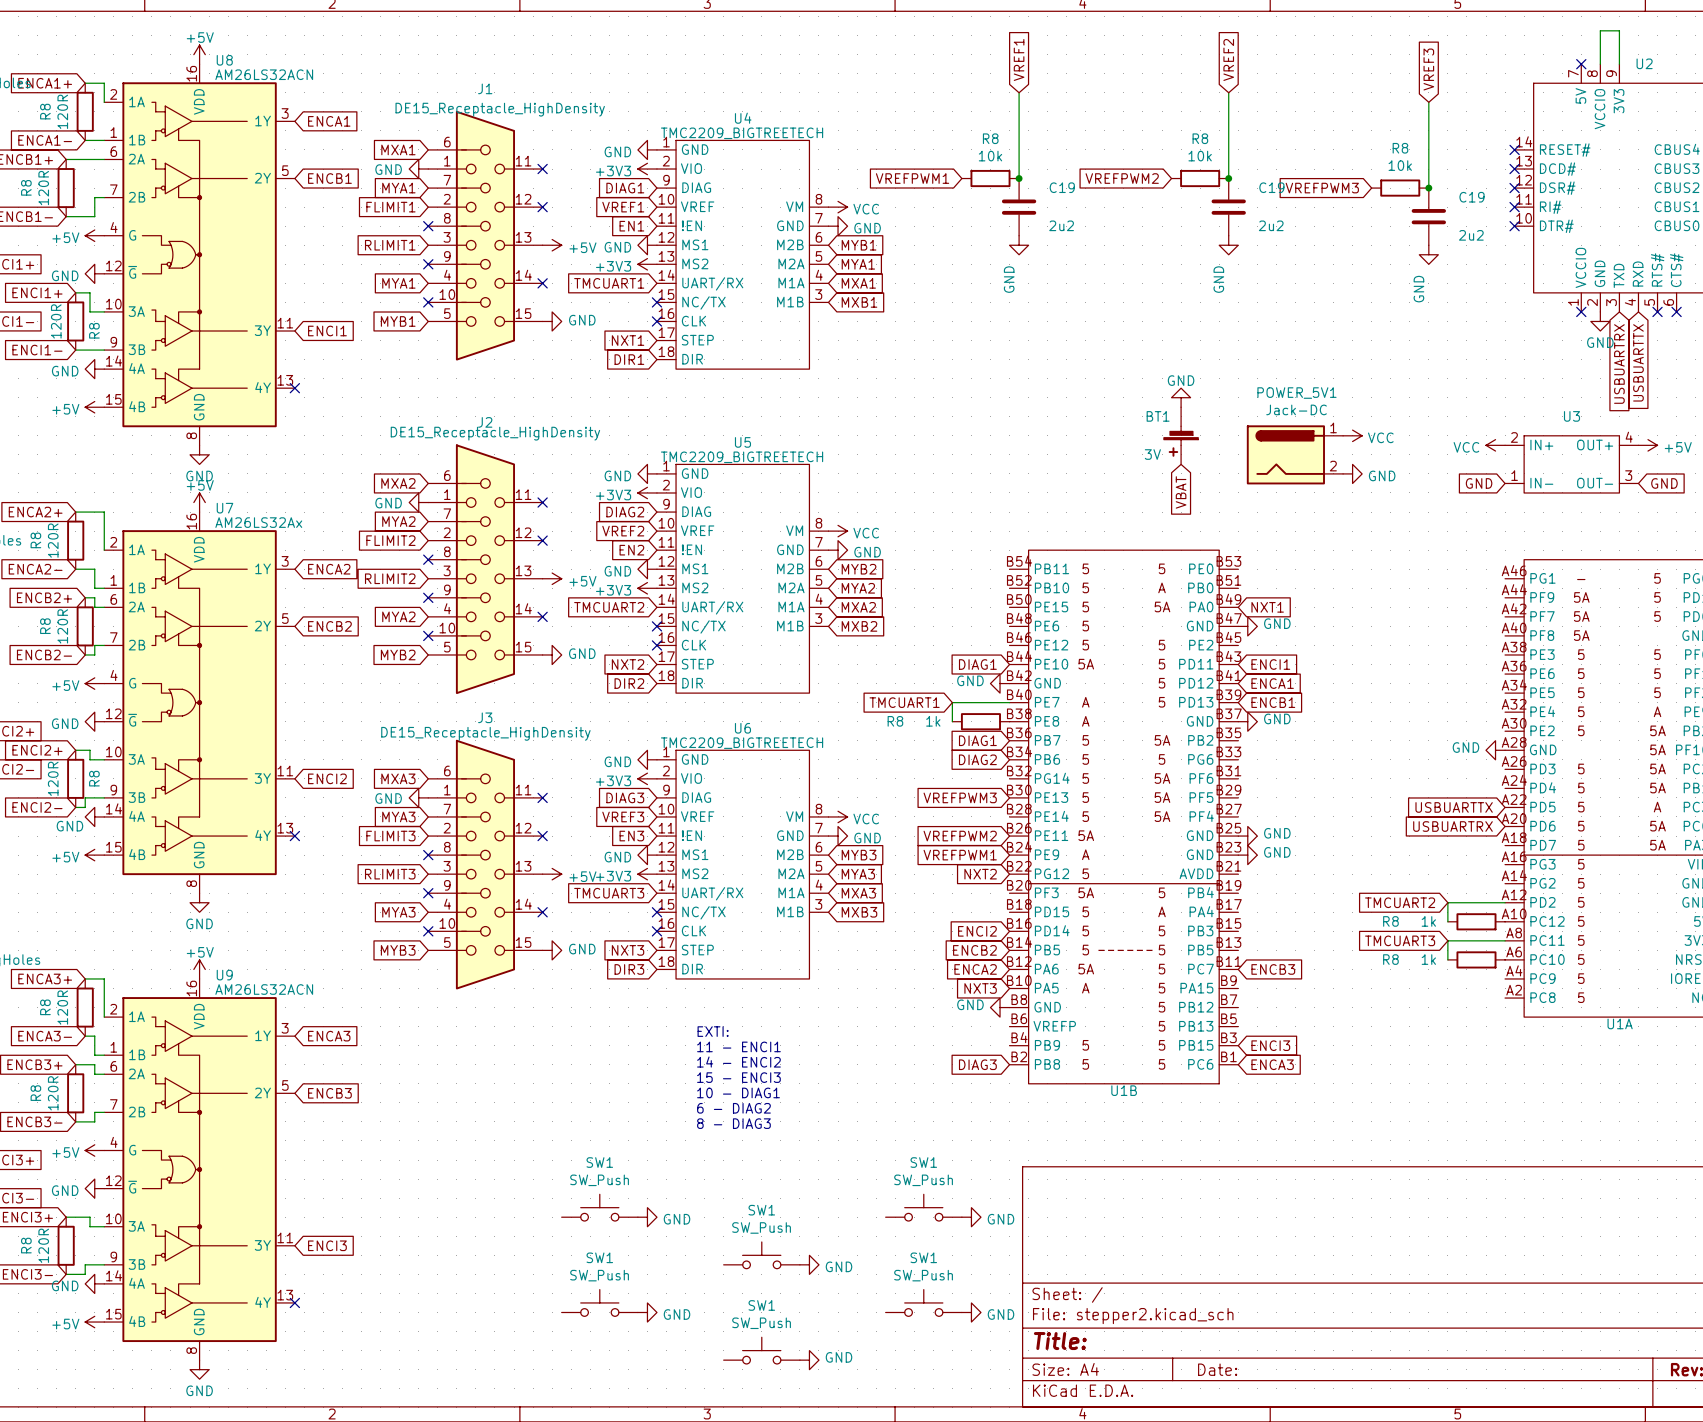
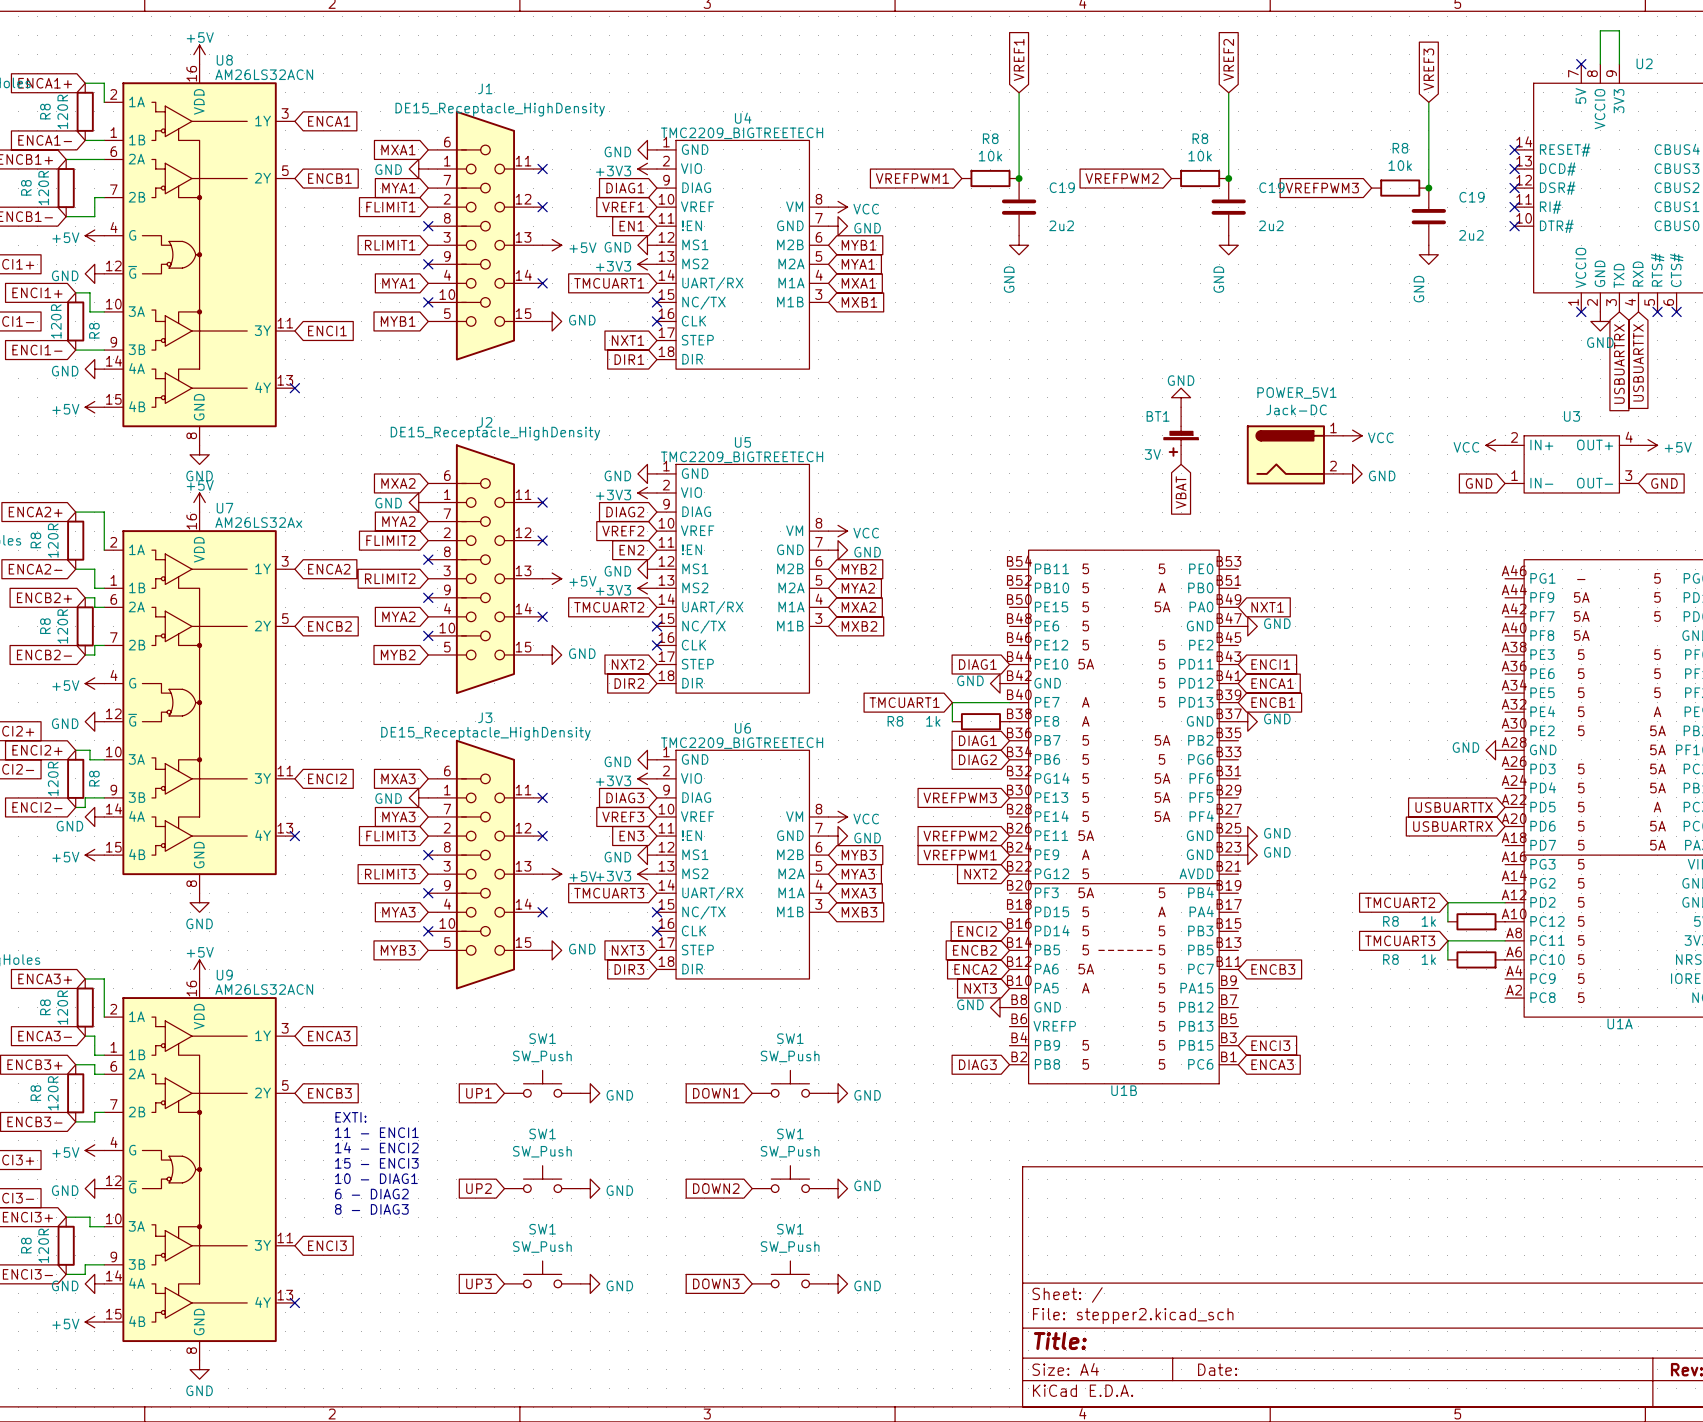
text: EXTI: (713, 1031) -> none
text: 11 - ENCI1 (738, 1046) -> none
text: 14 - ENCI2 (738, 1062) -> none
text: 15 - ENCI3 (738, 1077) -> none
SW1: none -> SW_Push (542, 1083)
SW1: none -> SW_Push (790, 1083)
text: 10 - DIAG1 (738, 1092) -> none
global label: none -> UP1 (478, 1093)
power symbol: none -> GND (590, 1093)
global label: none -> DOWN1 (716, 1093)
power symbol: none -> GND (838, 1093)
text: 6 - DIAG2 (733, 1108) -> none
text: none -> EXTI: (350, 1117)
text: 8 - DIAG3 (733, 1123) -> none
text: none -> 11 - ENCI1 (376, 1132)
text: none -> 14 - ENCI2 (376, 1147)
text: none -> 15 - ENCI3 (376, 1163)
text: none -> 10 - DIAG1 (376, 1178)
SW1: none -> SW_Push (542, 1179)
SW1: none -> SW_Push (790, 1179)
global label: none -> UP2 (478, 1188)
power symbol: none -> GND (590, 1188)
global label: none -> DOWN2 (716, 1188)
power symbol: none -> GND (838, 1188)
text: none -> 6 - DIAG2 (371, 1194)
SW1: SW_Push (599, 1207) -> none
SW1: SW_Push (923, 1207) -> none
text: none -> 8 - DIAG3 (371, 1209)
power symbol: GND (647, 1217) -> none
power symbol: GND (971, 1217) -> none
SW1 position: (761, 1255) -> (790, 1274)
power symbol position: GND (809, 1264) -> GND (838, 1283)
SW1: none -> SW_Push (542, 1274)
global label: none -> UP3 (478, 1283)
power symbol: none -> GND (590, 1283)
global label: none -> DOWN3 (716, 1283)
SW1: SW_Push (599, 1302) -> none
SW1: SW_Push (923, 1302) -> none
power symbol: GND (647, 1312) -> none
power symbol: GND (971, 1312) -> none
SW1: SW_Push (761, 1350) -> none
power symbol: GND (809, 1360) -> none

